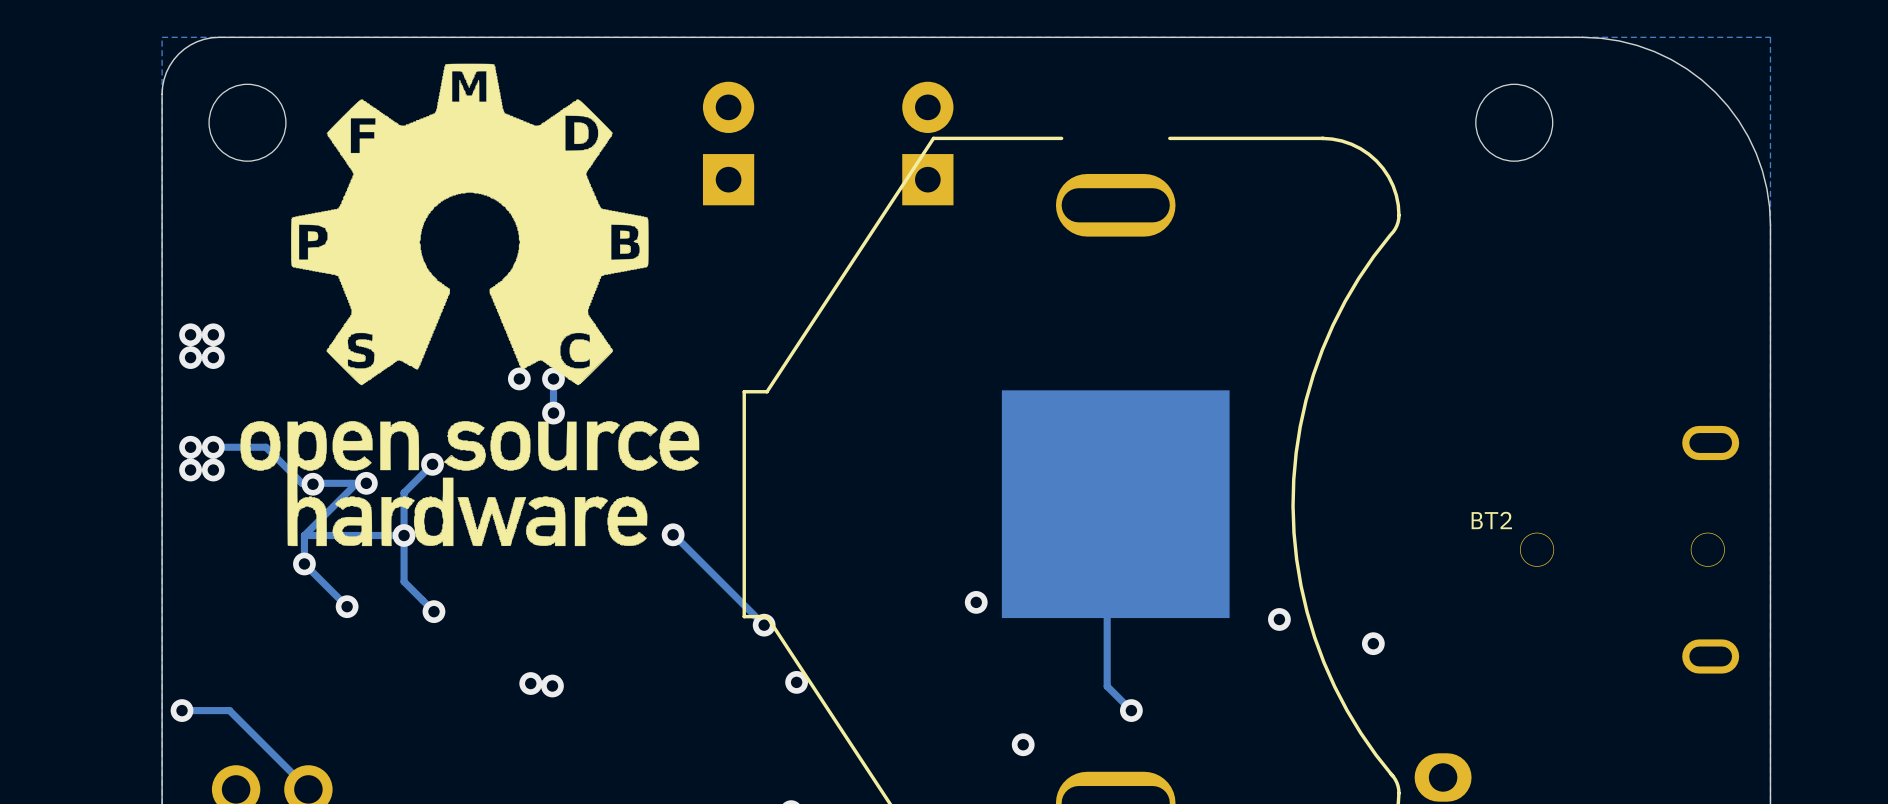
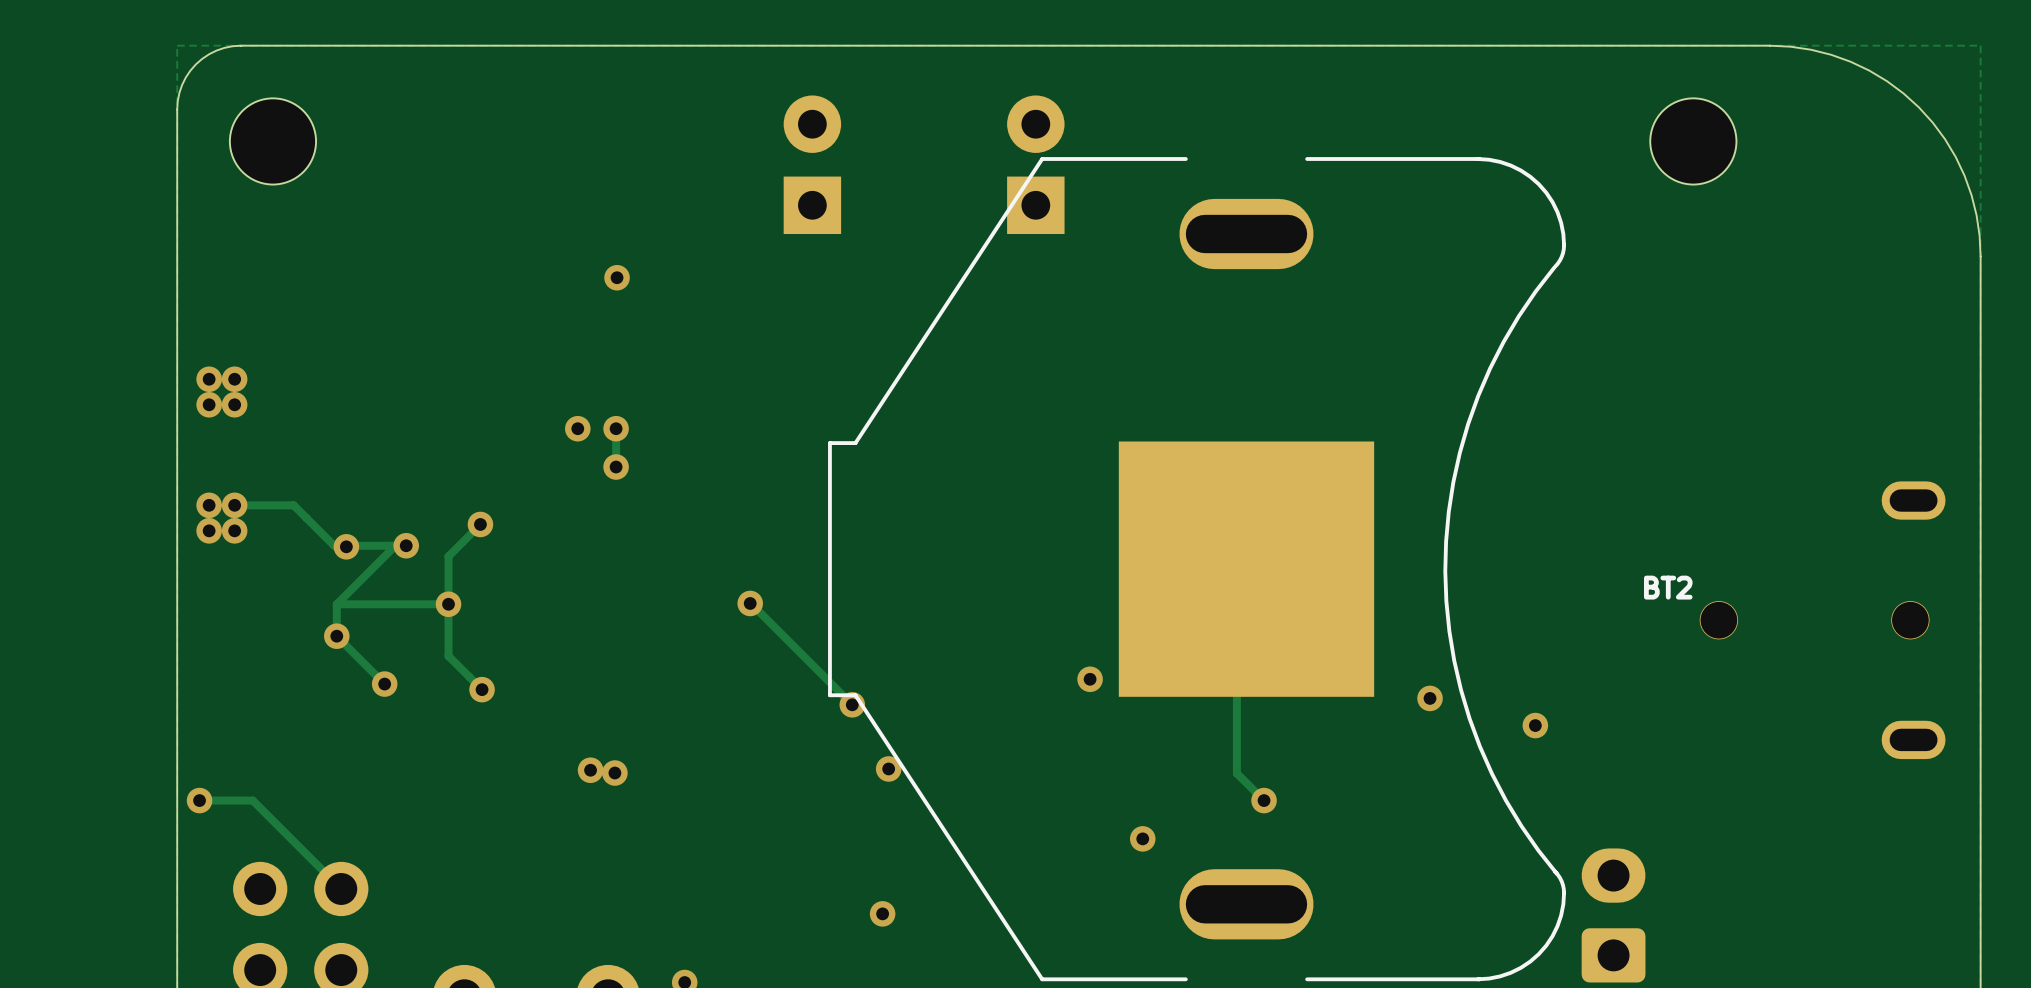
drawing: [240, 63, 700, 547] -> none

